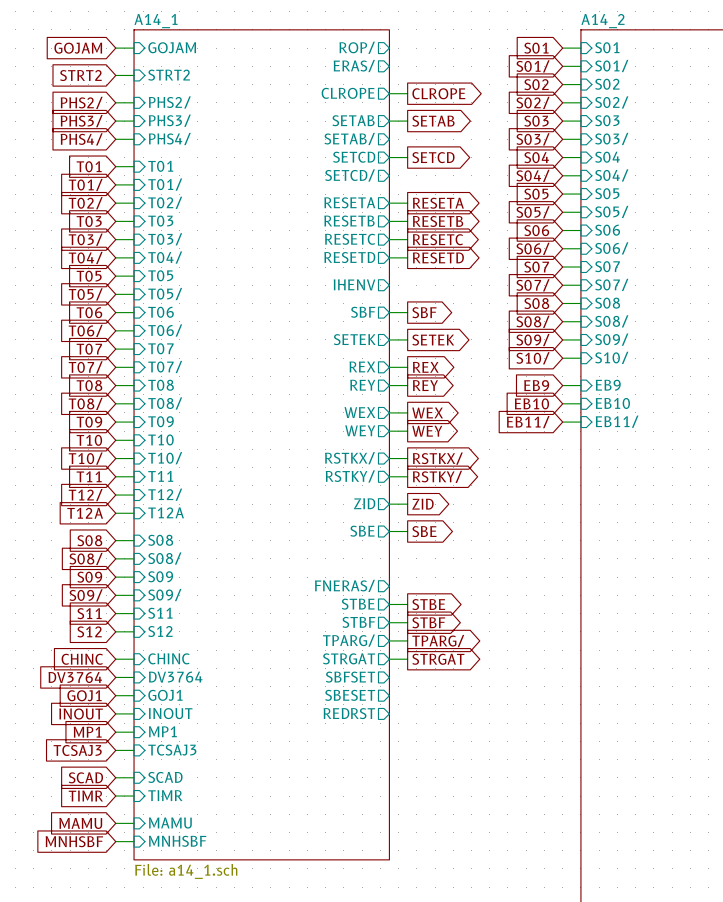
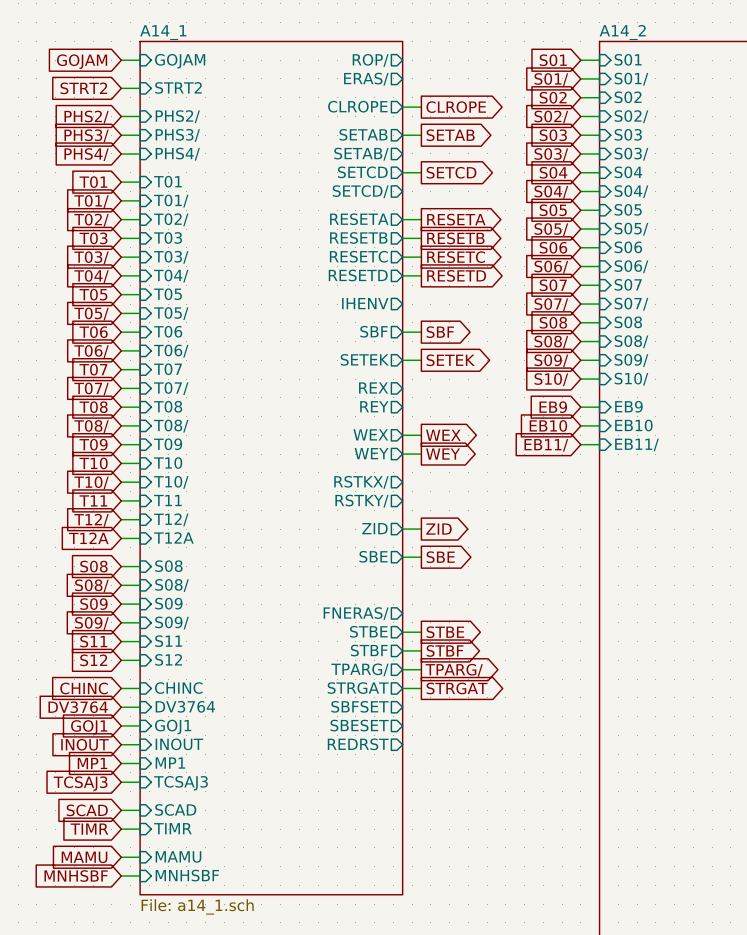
wire: (389, 367) (407, 367) -> none
global label: REX (425, 367) -> none
wire: (389, 385) (407, 385) -> none
global label: REY (425, 385) -> none
wire: (389, 458) (407, 458) -> none
global label: RSTKX/ (437, 458) -> none
wire: (389, 476) (407, 476) -> none
global label: RSTKY/ (437, 476) -> none

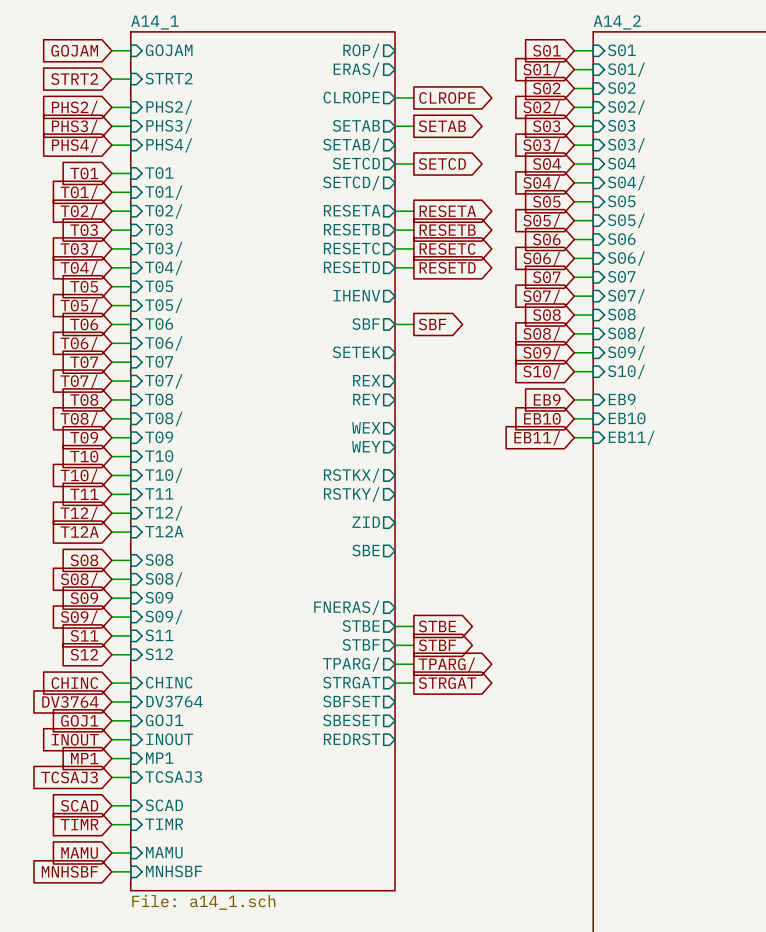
wire: (402, 360) (421, 360) -> none
global label: SETEK (450, 360) -> none
wire: (402, 435) (421, 435) -> none
global label: WEX (443, 435) -> none
wire: (402, 454) (421, 454) -> none
global label: WEY (443, 454) -> none
wire: (402, 529) (421, 529) -> none
global label: ZID (439, 529) -> none
wire: (402, 557) (421, 557) -> none
global label: SBE (440, 557) -> none

